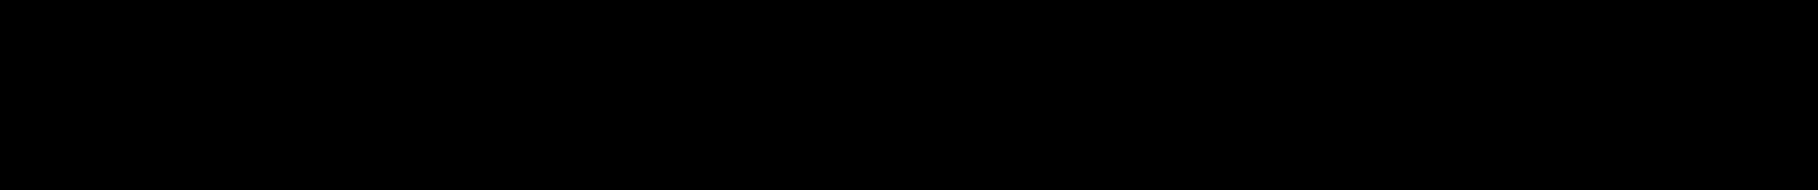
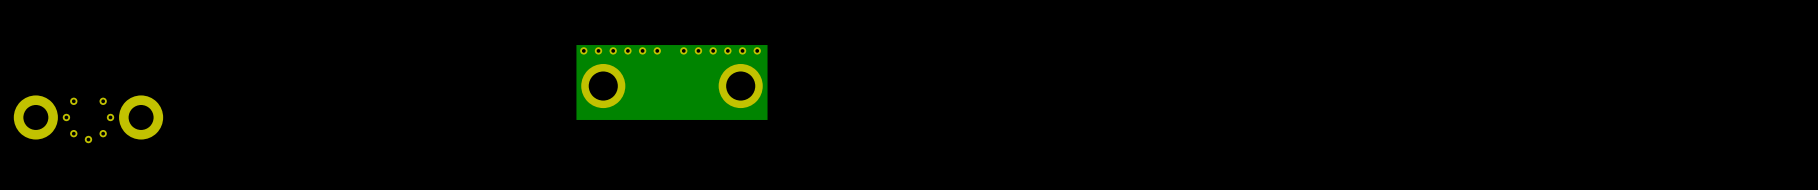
part: none -> (671, 82)
part: none -> (88, 119)

